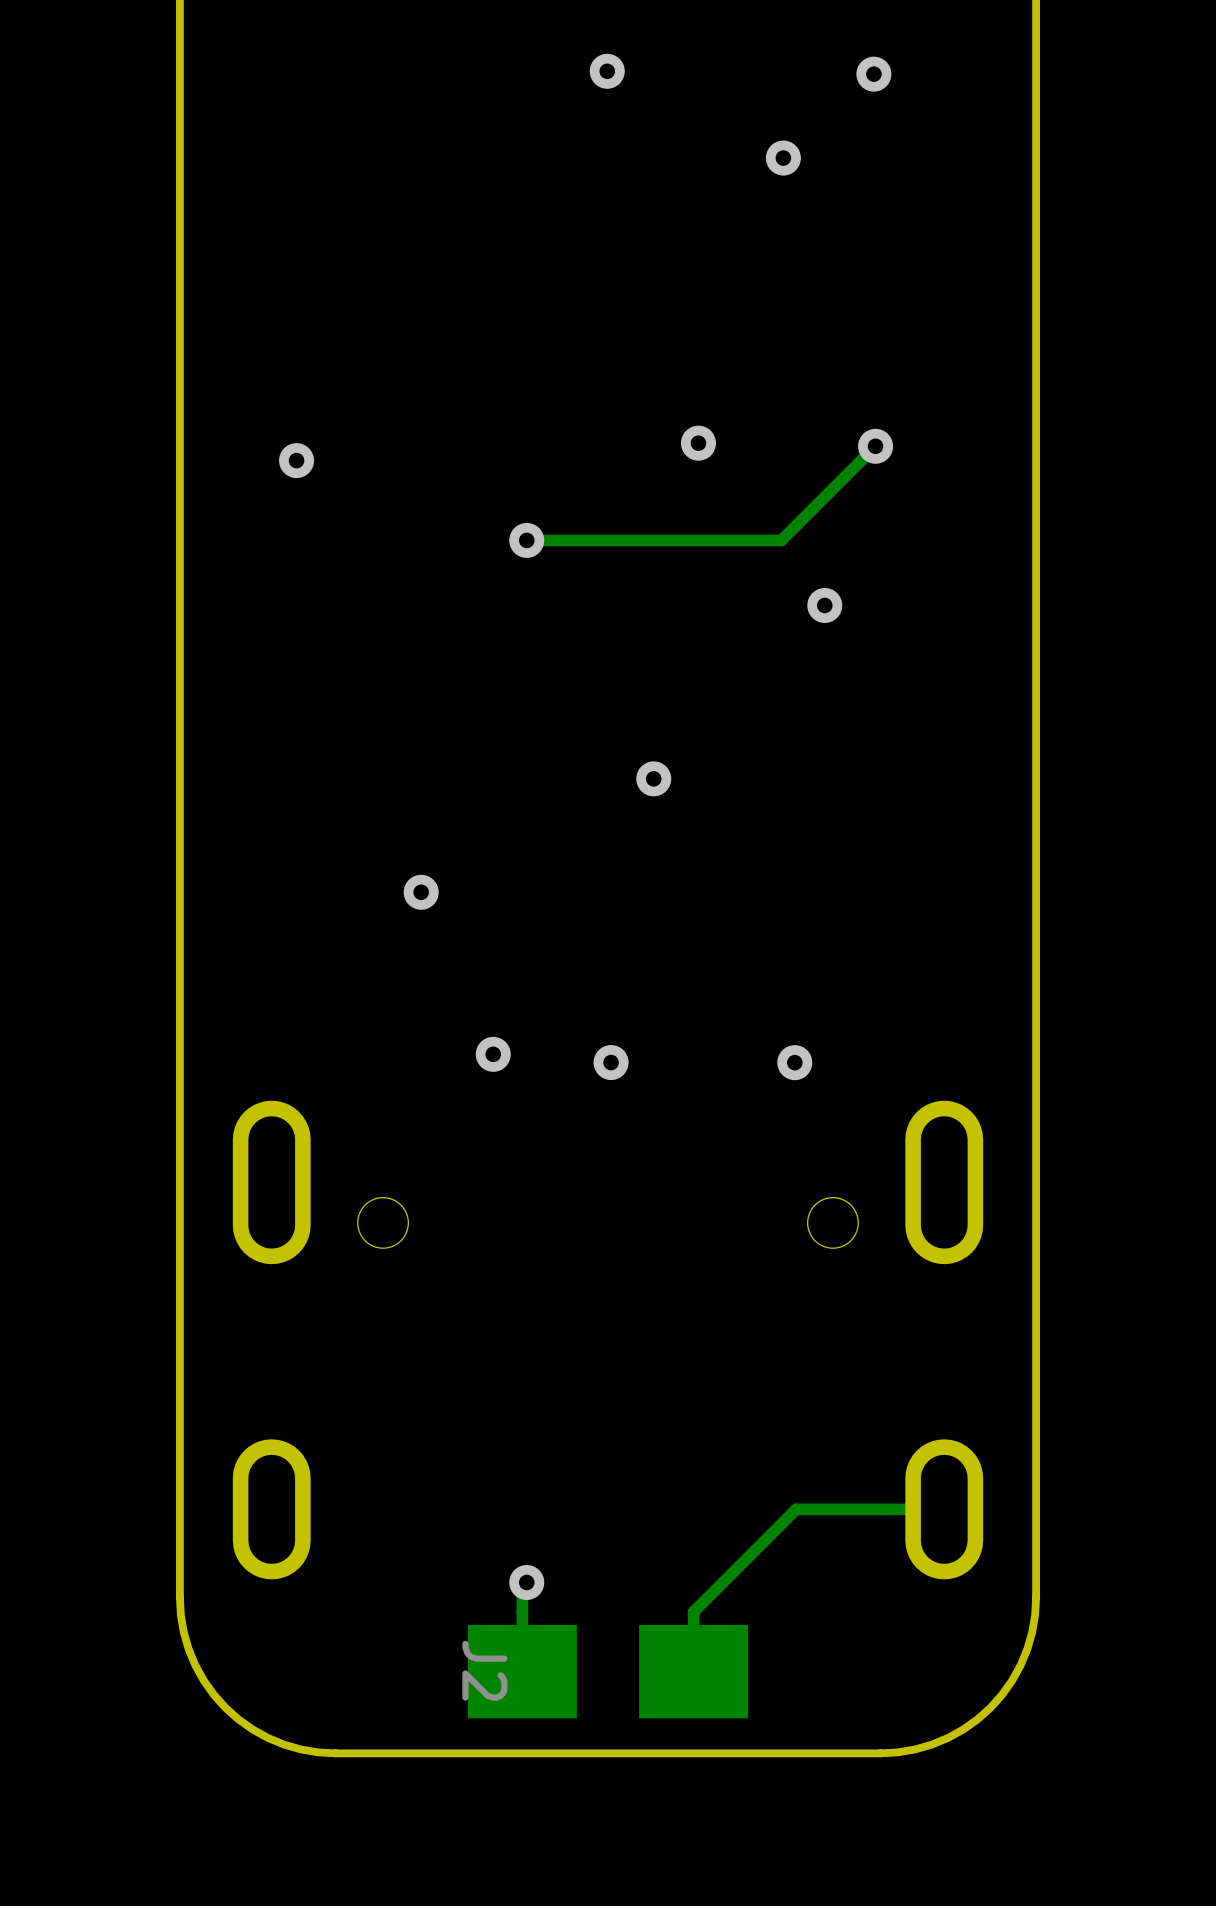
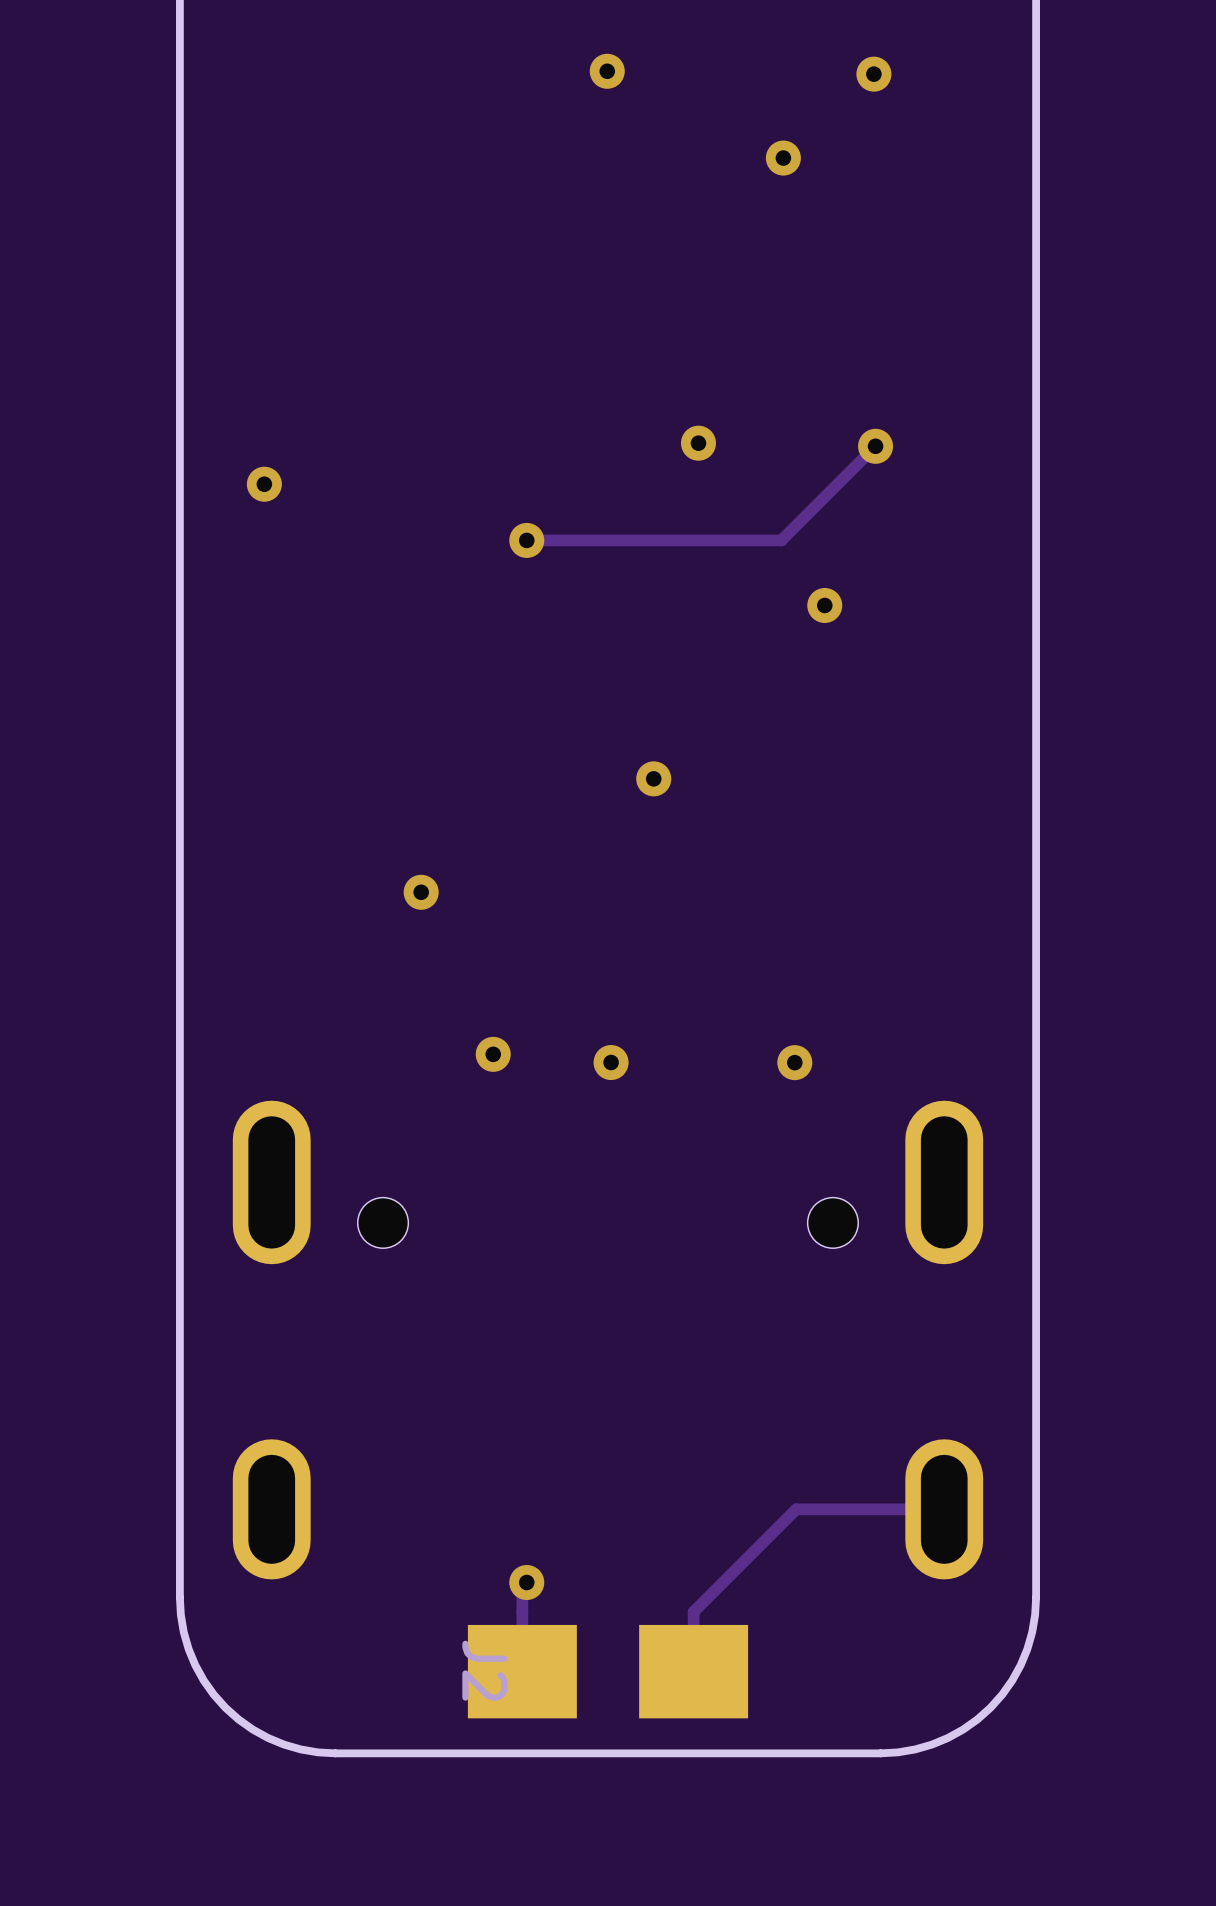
via position: (296, 460) -> (264, 484)

